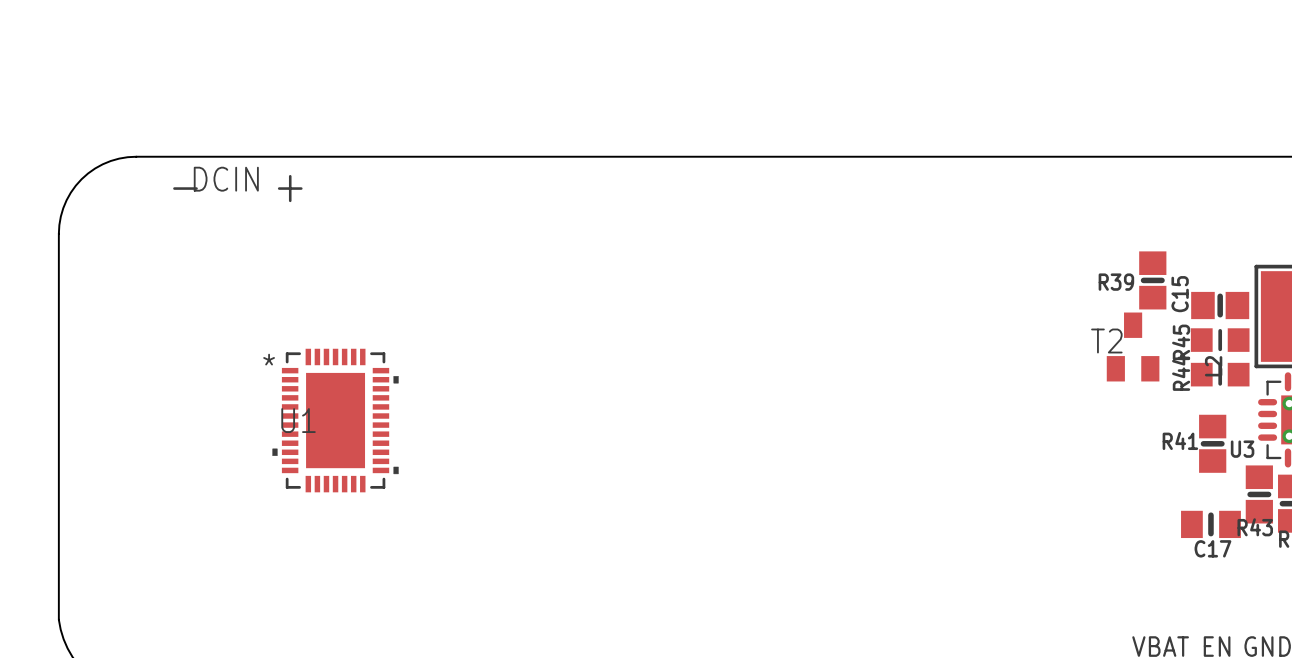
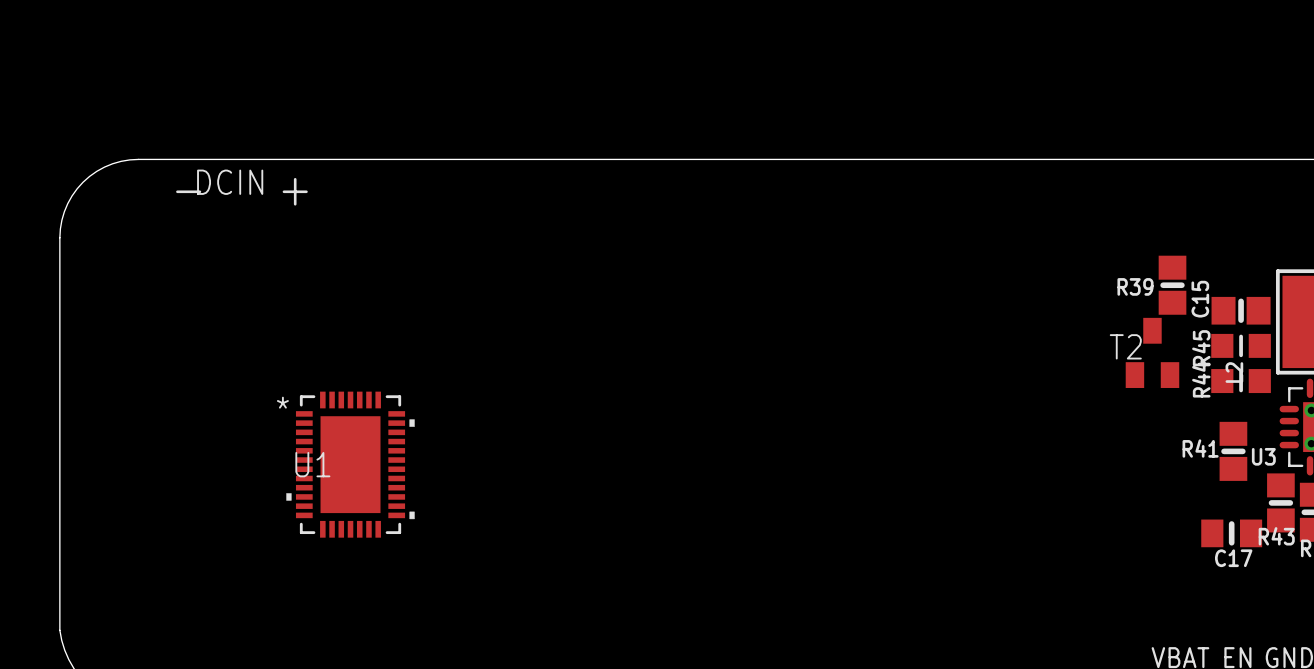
U1 position: (335, 420) -> (350, 464)

